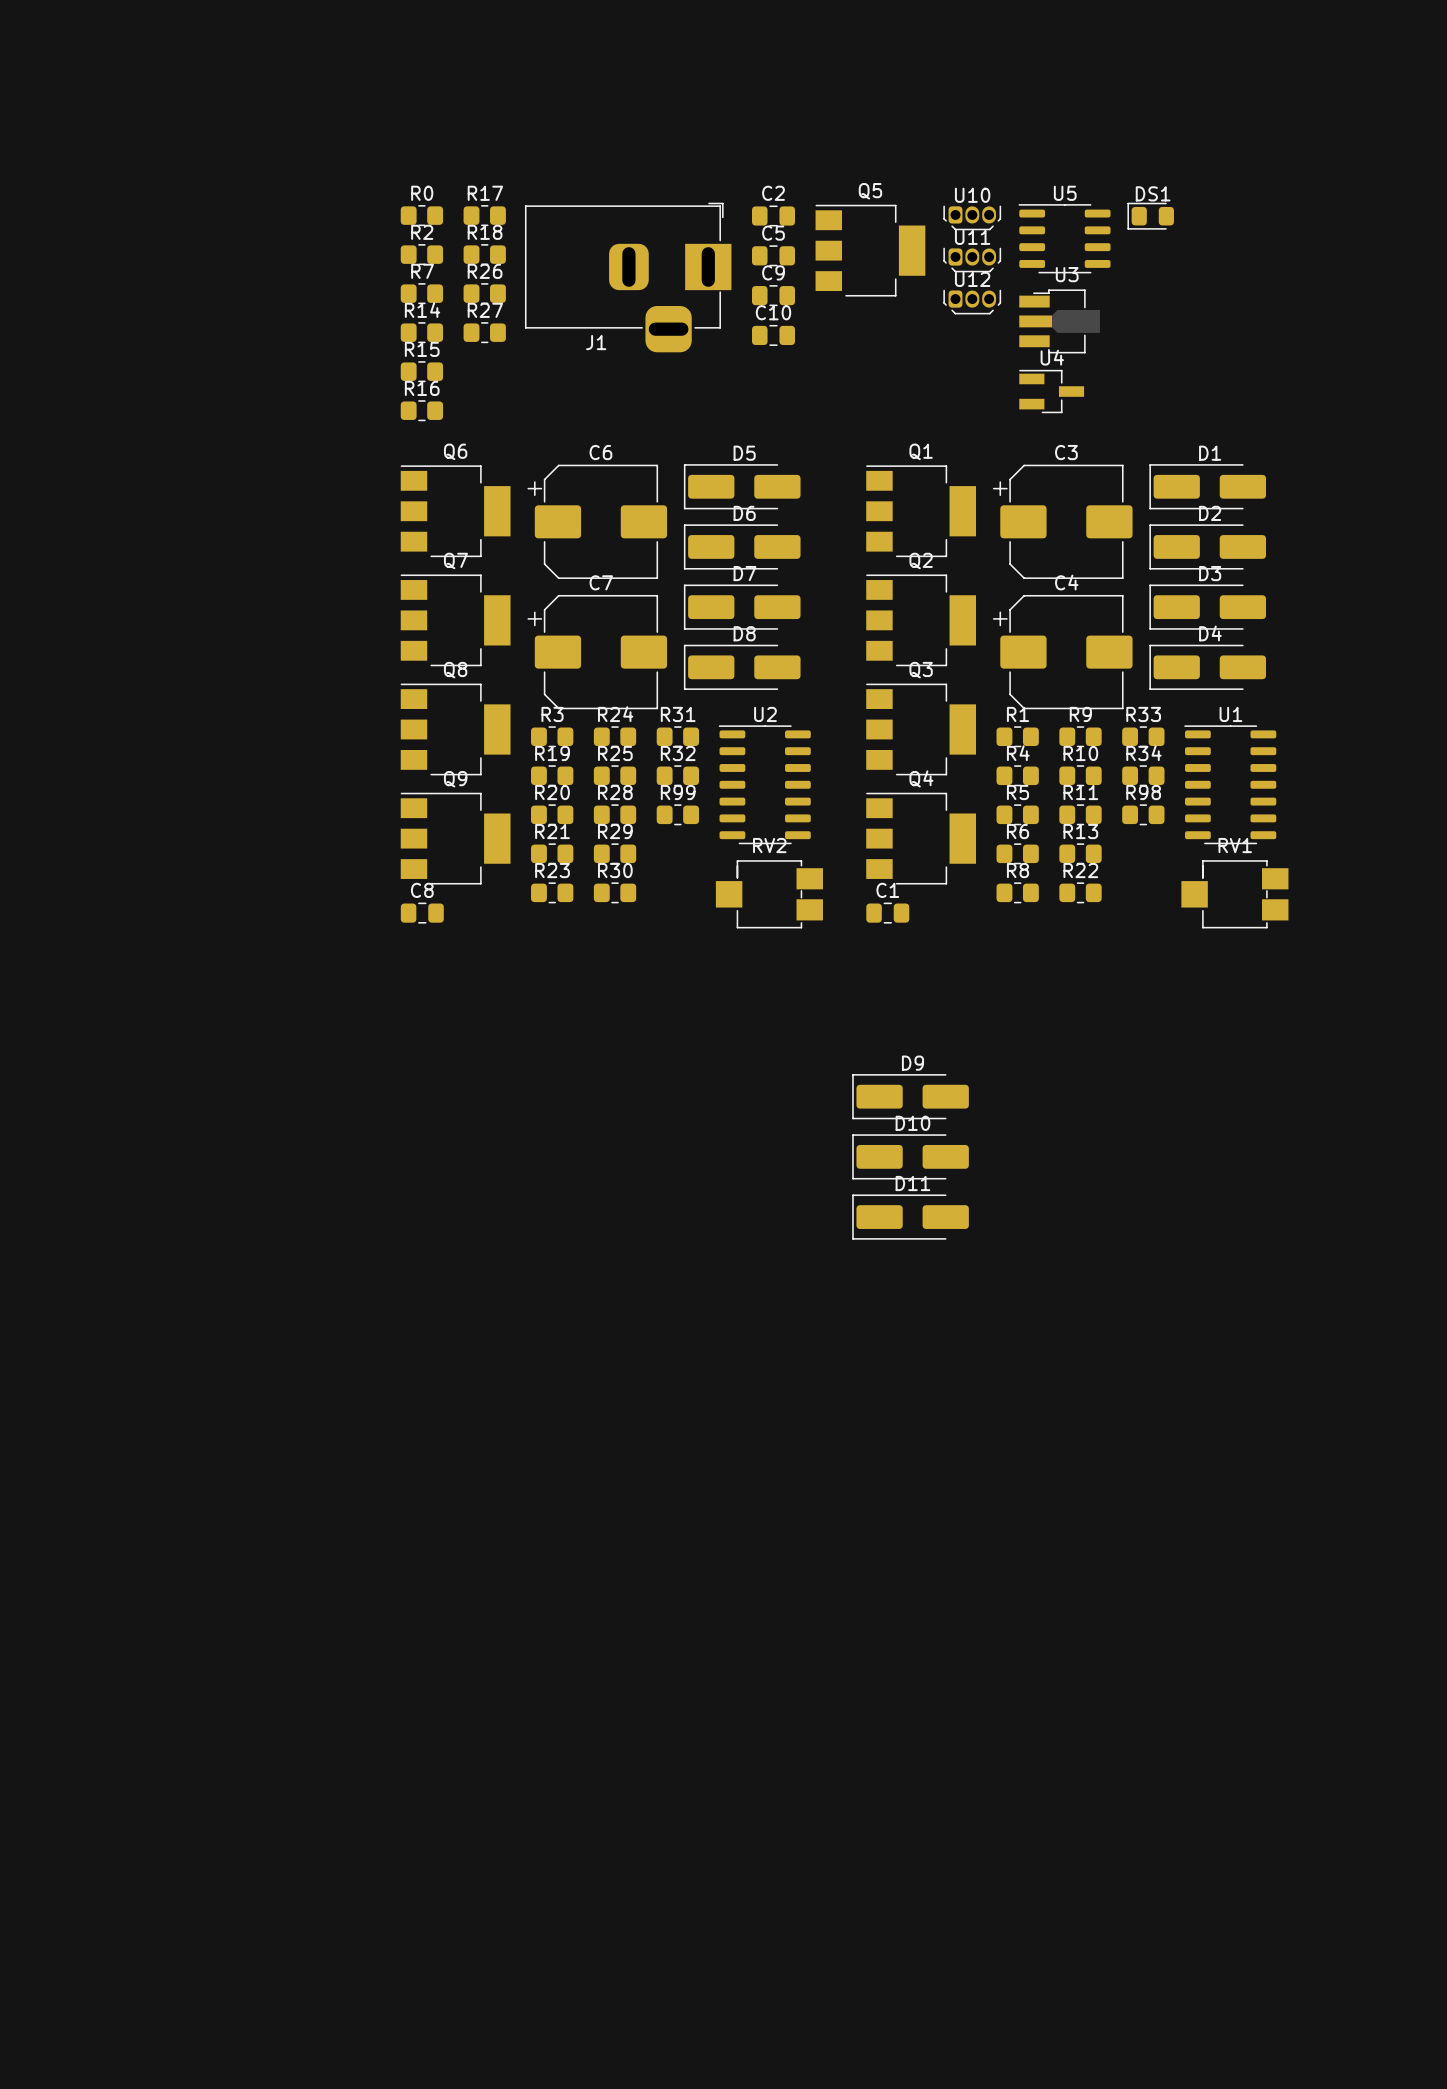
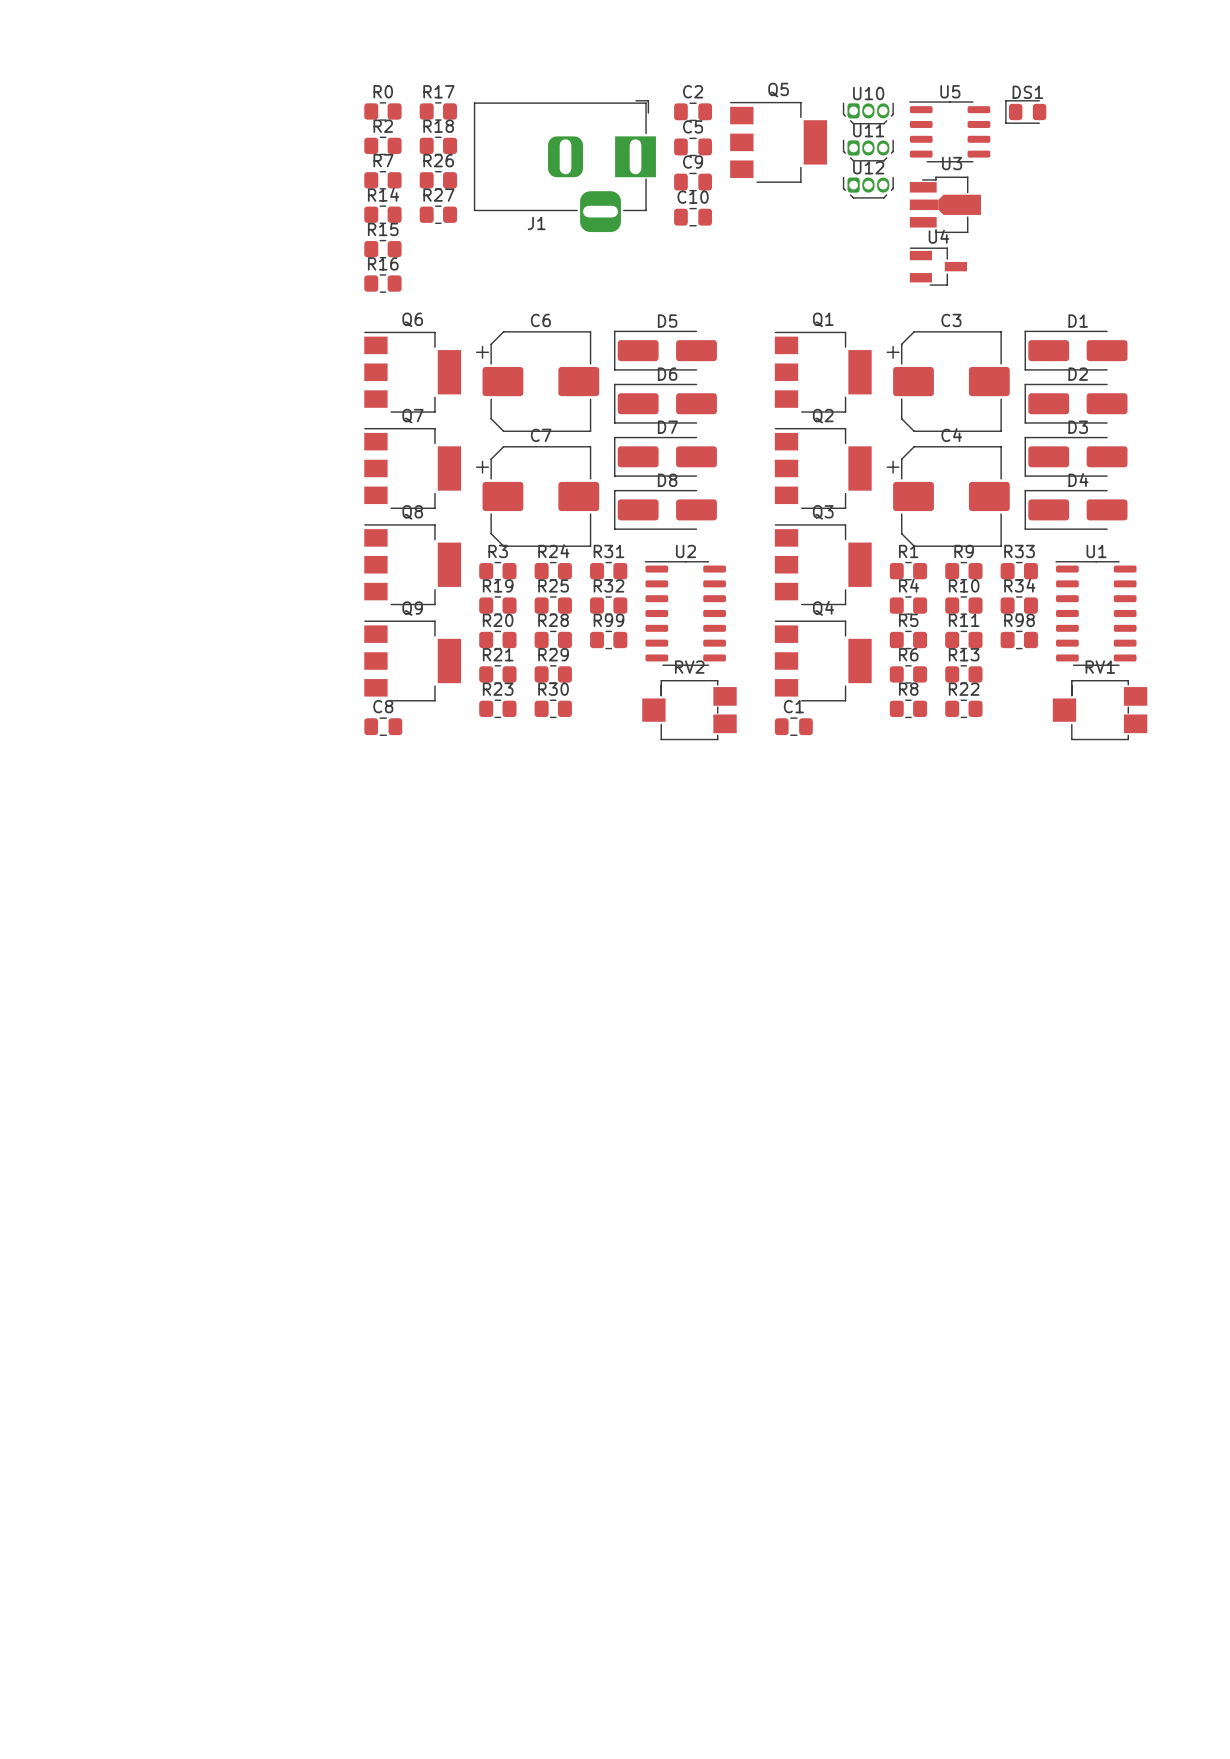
D9: (910, 1096) -> none
D10: (910, 1156) -> none
D11: (910, 1217) -> none

